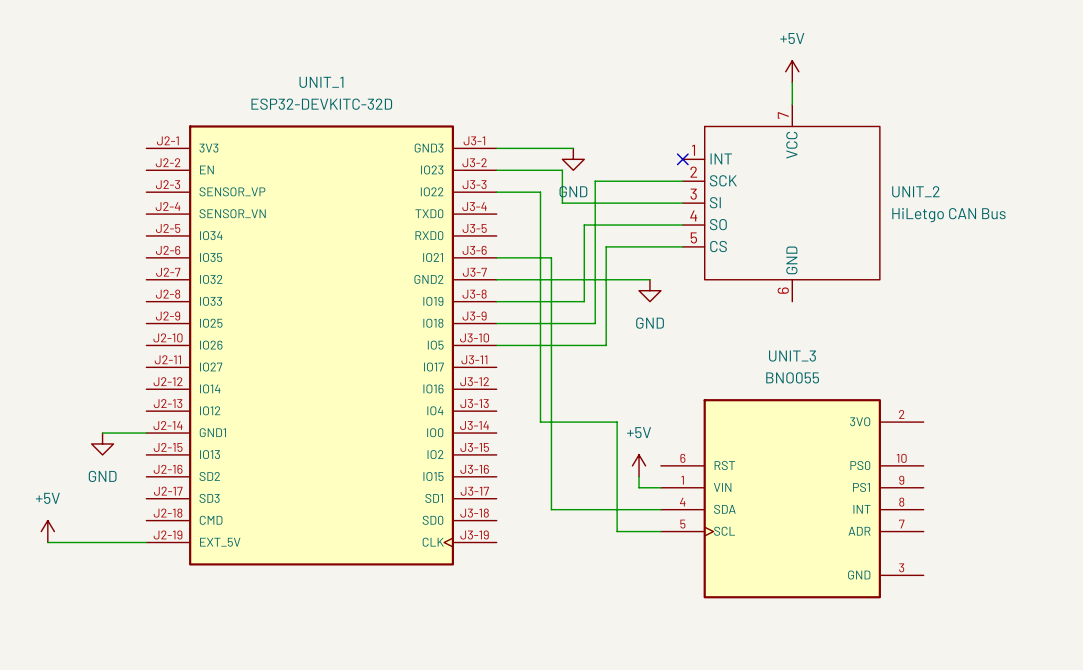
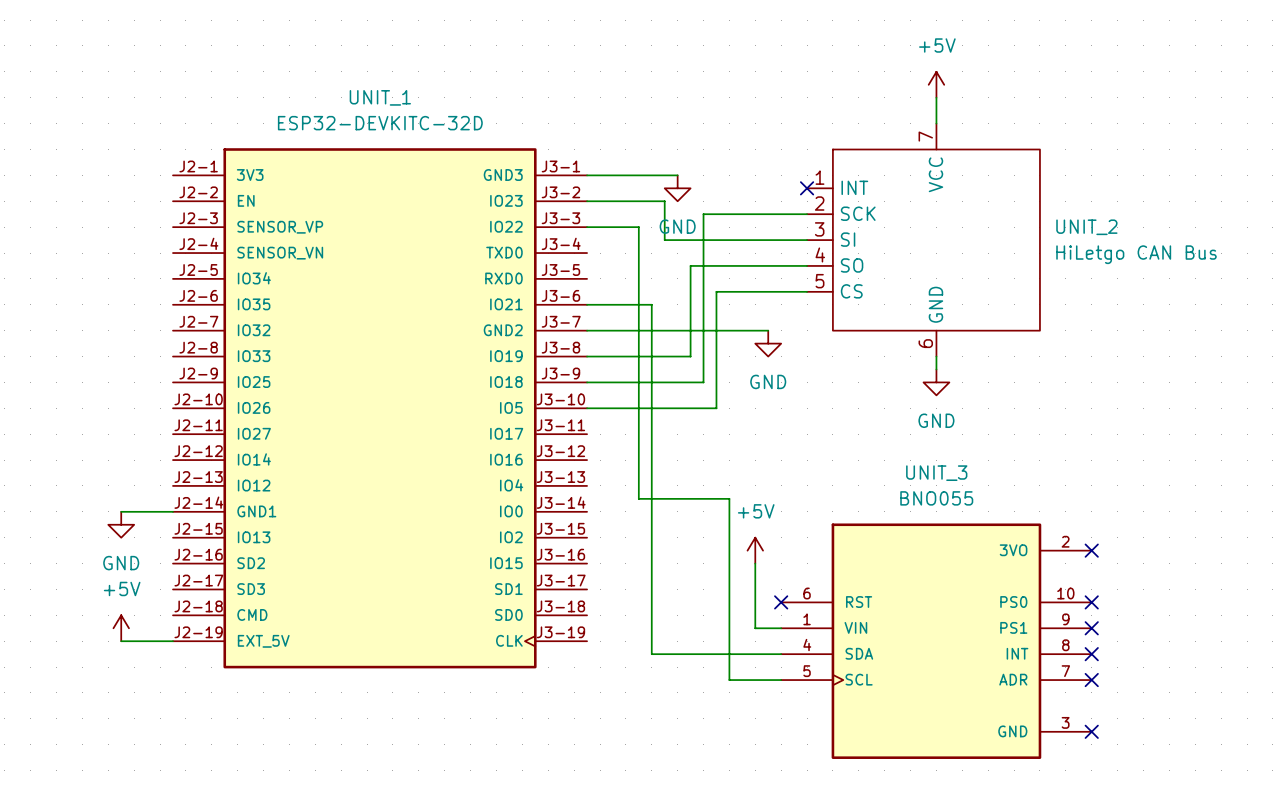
wire: none -> (936, 356) (936, 369)
power symbol: none -> GND (936, 382)
no-connect mark: none -> (1091, 550)
wire: (639, 487) (660, 487) -> (755, 576) (755, 628)
UNIT_3 position: (792, 498) -> (936, 641)
wire: (551, 509) (660, 509) -> (651, 602) (651, 654) (781, 654)
no-connect mark: none -> (781, 602)
no-connect mark: none -> (1091, 602)
power symbol position: +5V (47, 531) -> +5V (121, 628)
wire: (617, 531) (639, 531) -> (729, 628) (729, 680) (781, 680)
no-connect mark: none -> (1091, 628)
wire: (47, 542) (102, 542) -> none
no-connect mark: none -> (1091, 654)
no-connect mark: none -> (1091, 680)
no-connect mark: none -> (1091, 731)

